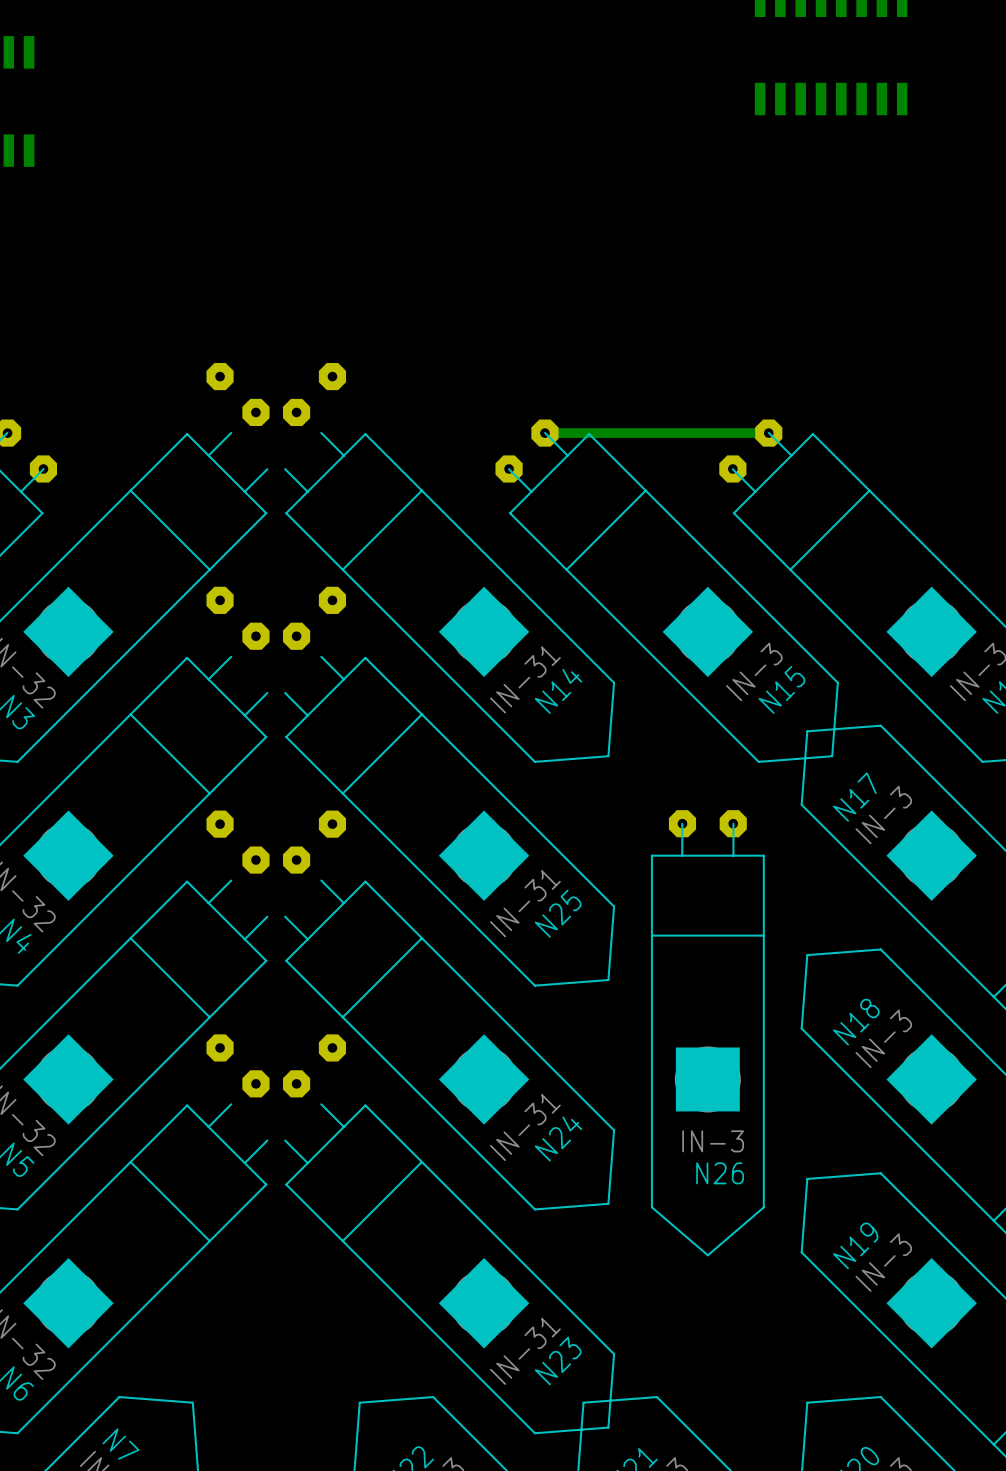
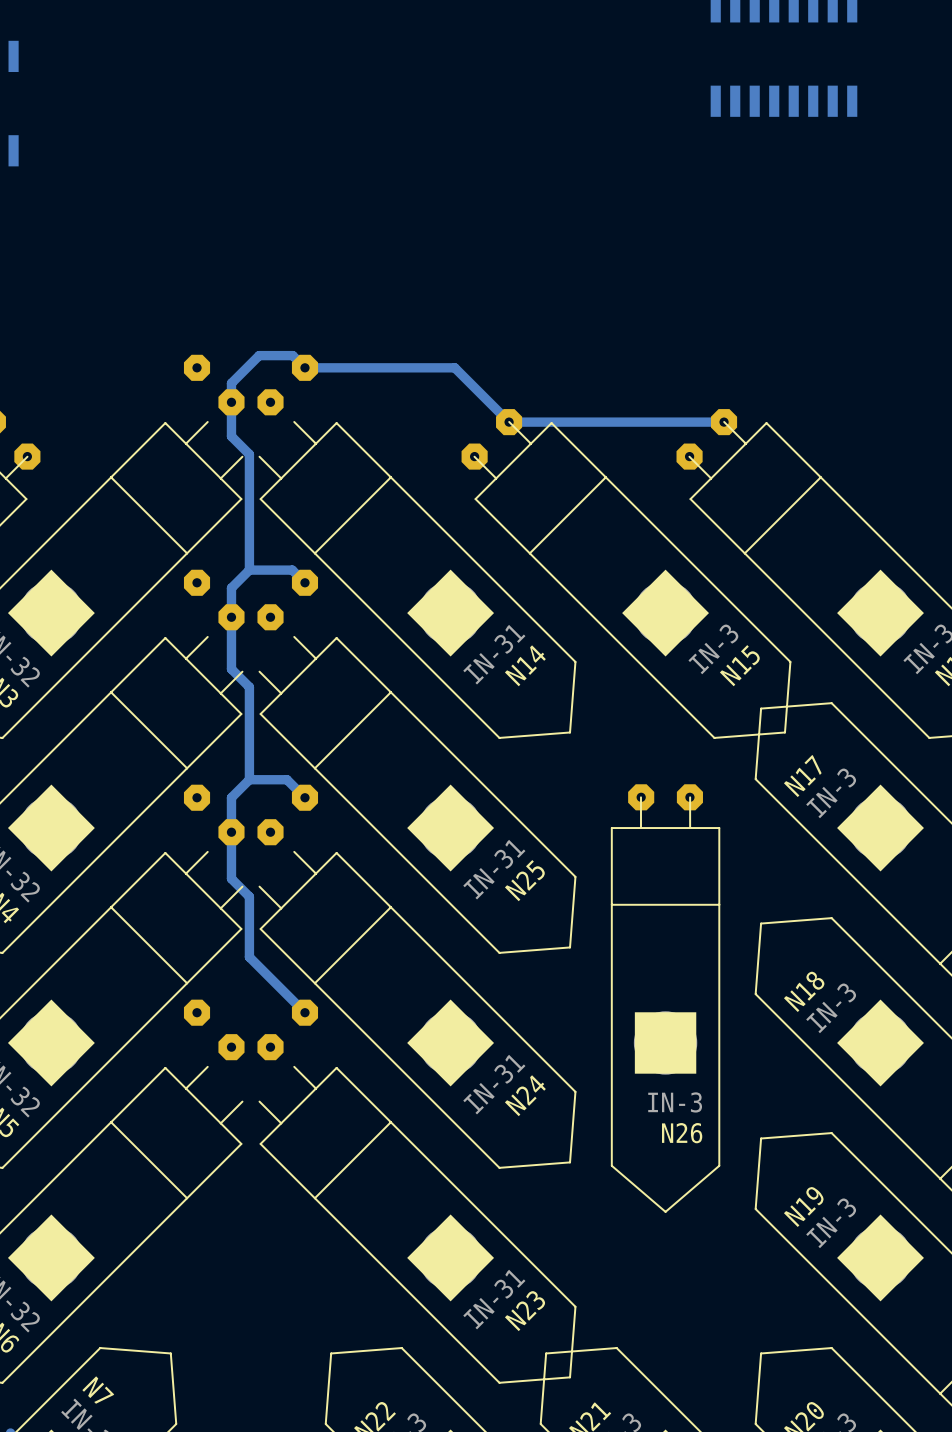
bottom track: none -> (509, 422) (454, 367) (304, 367) (292, 355) (259, 355) (231, 383) (231, 436) (249, 454) (249, 570)
bottom track: none -> (249, 570) (292, 570) (304, 582)
bottom track: none -> (249, 570) (231, 588) (231, 669) (249, 687) (249, 779)
bottom track: none -> (249, 779) (286, 779) (304, 797)
bottom track: none -> (249, 779) (231, 797) (231, 878) (249, 896) (249, 957) (304, 1012)

